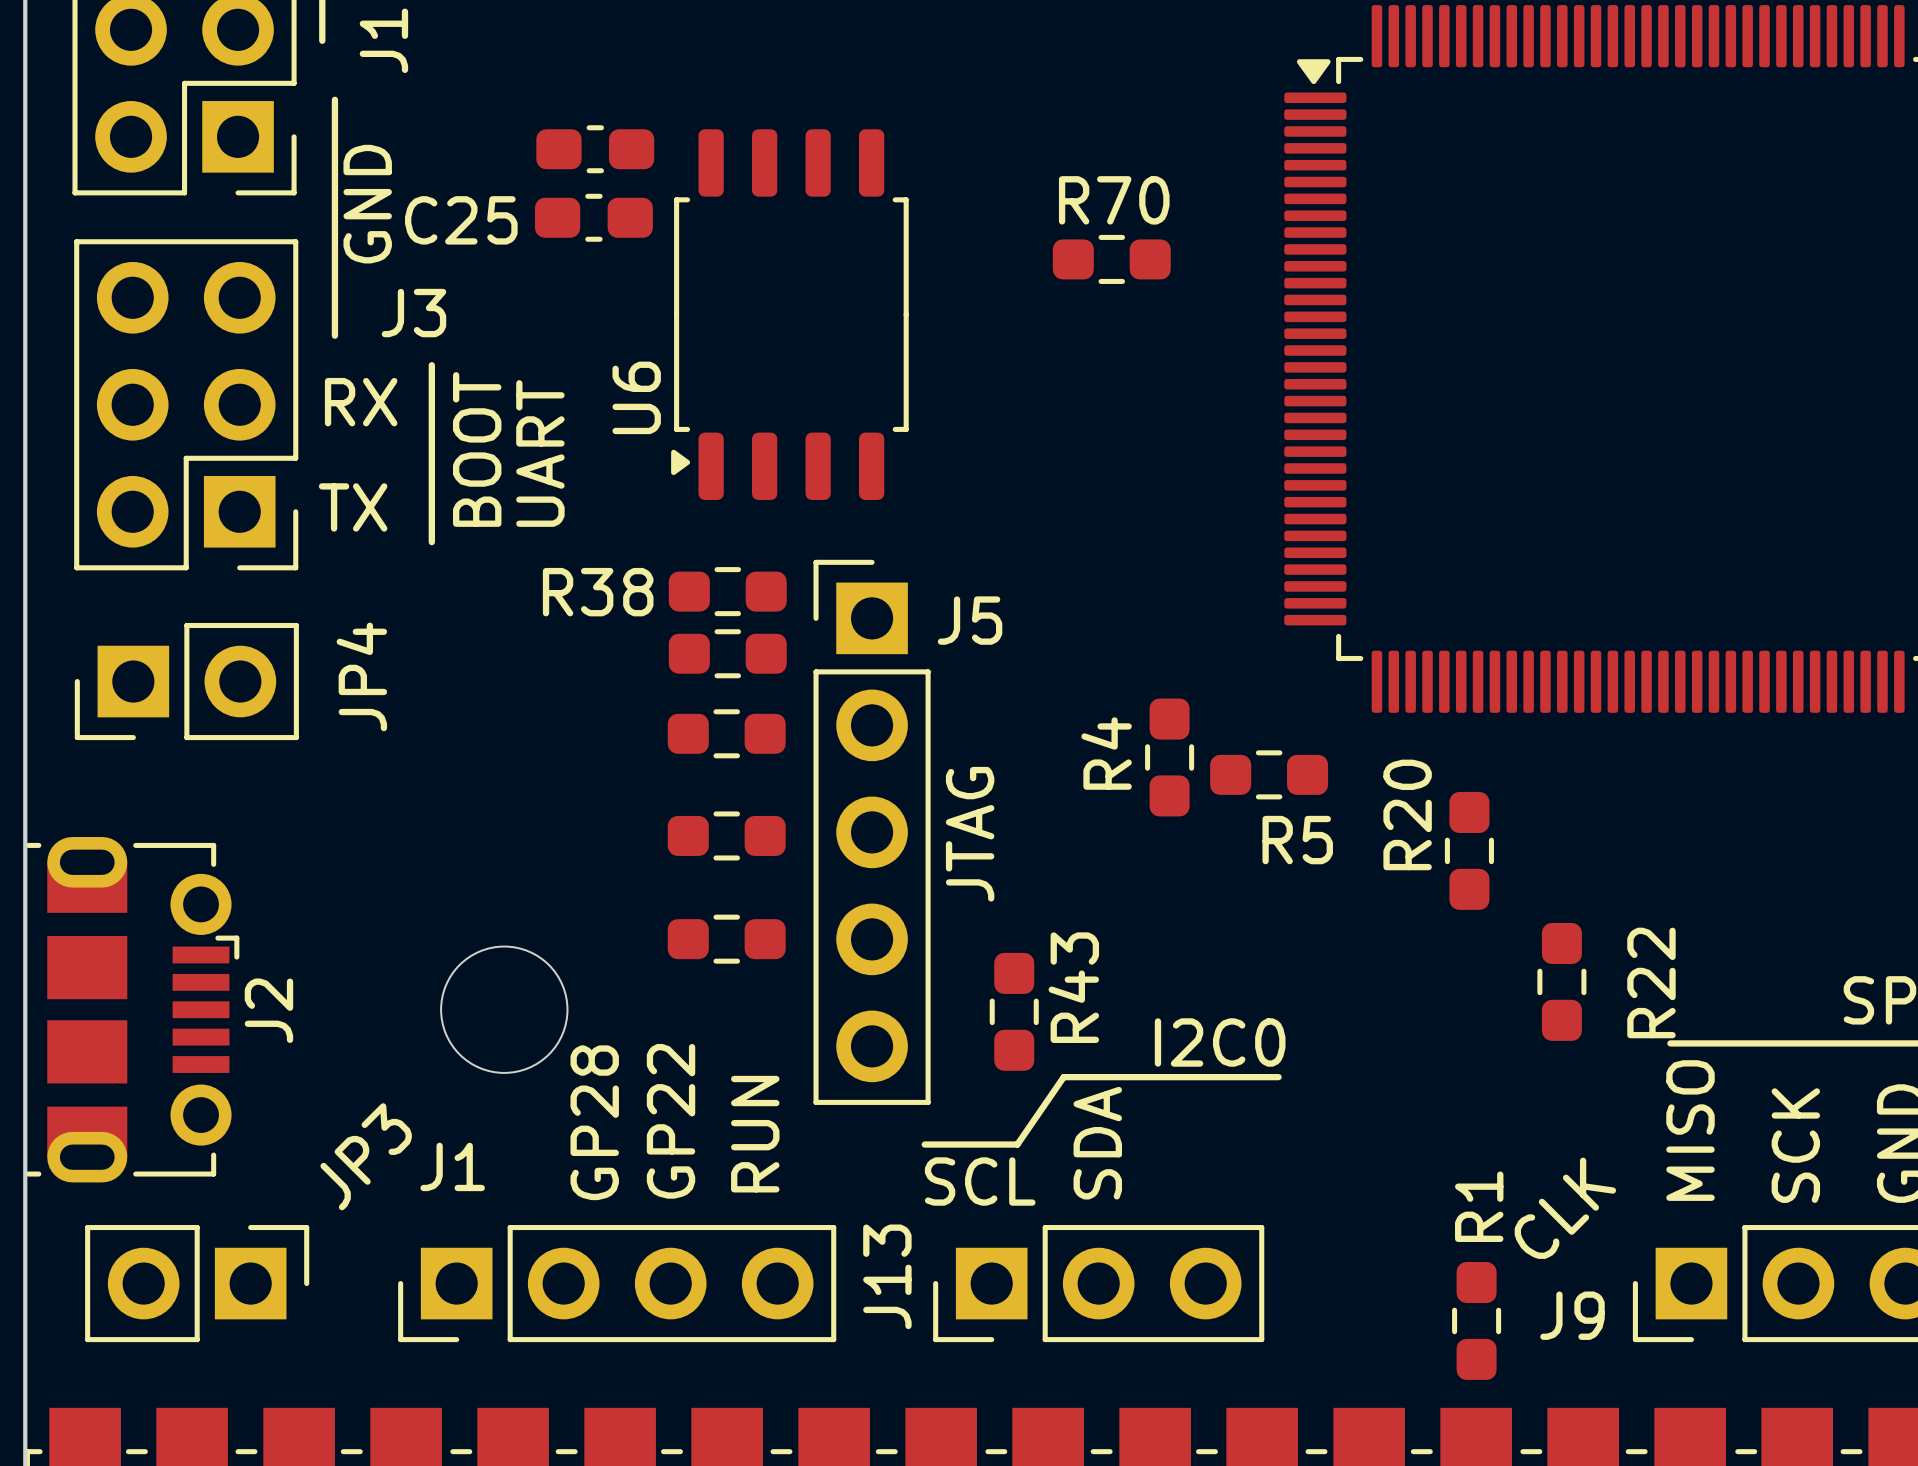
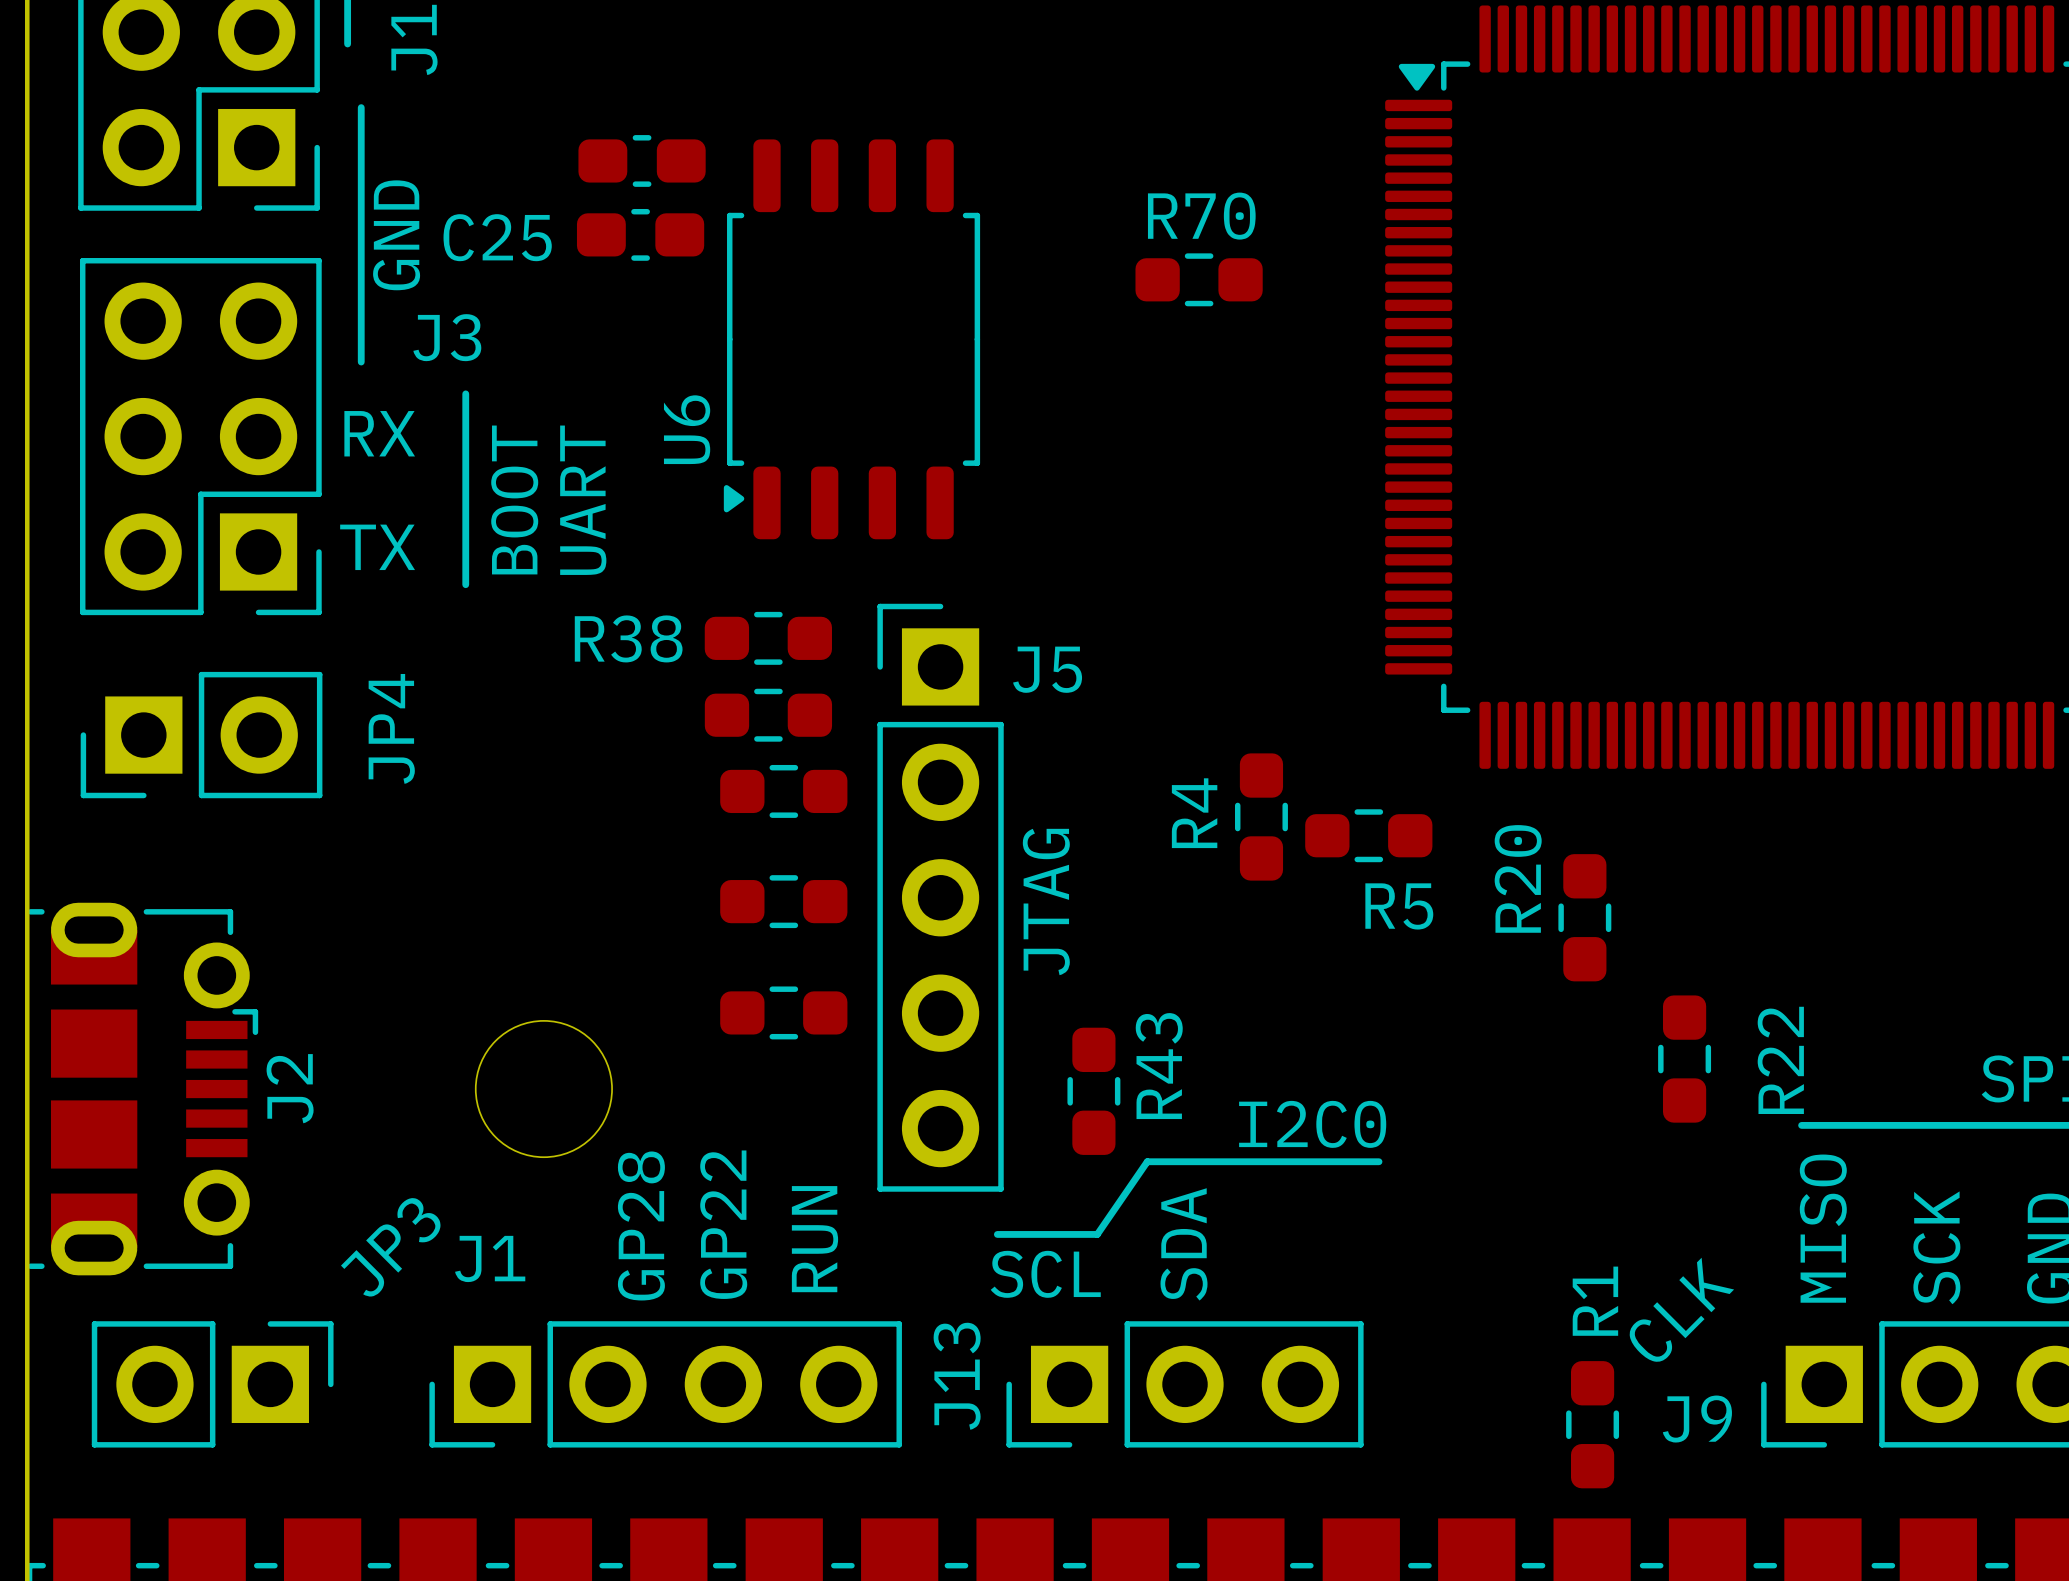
R38 position: (727, 591) -> (768, 638)
part position: (727, 653) -> (768, 715)

